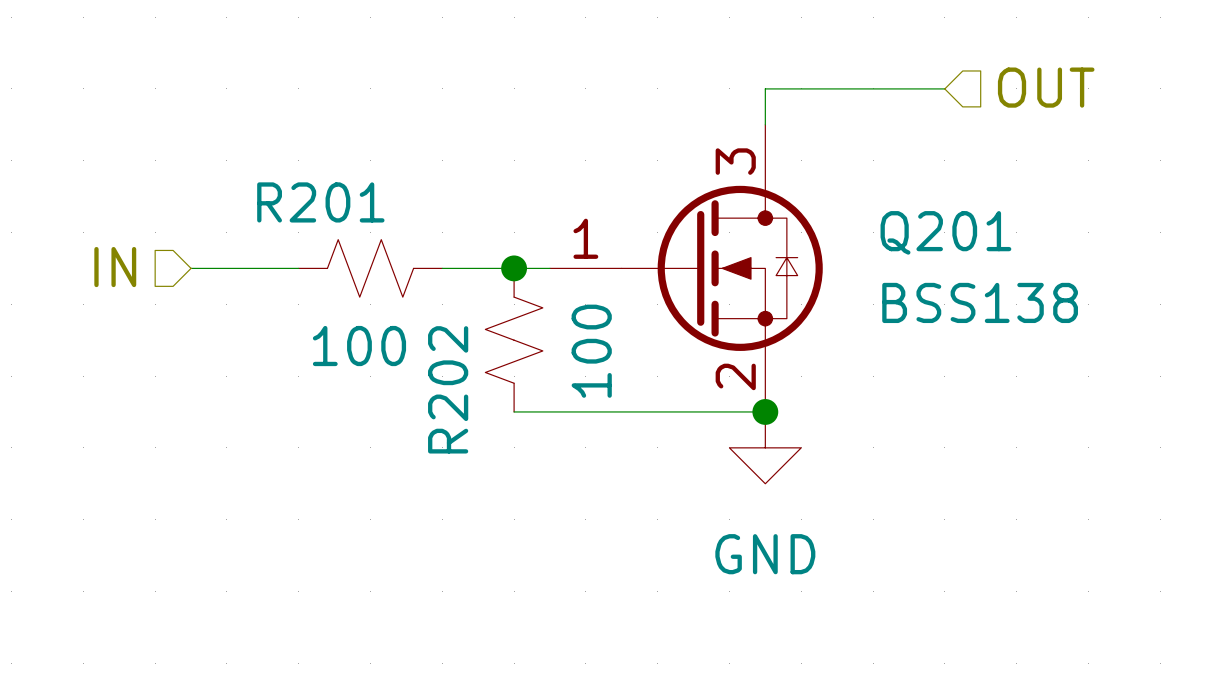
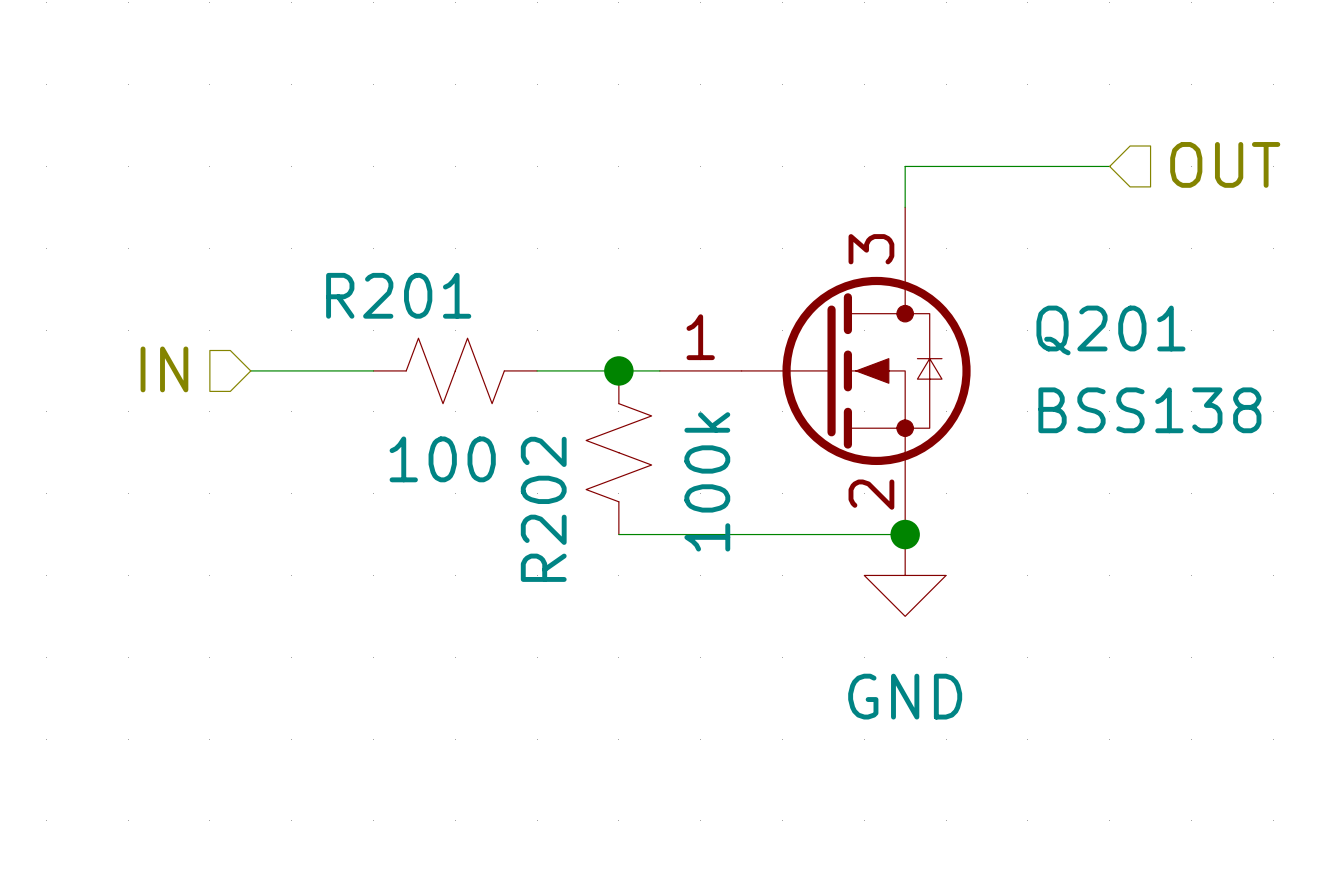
R202 value: 100 (591, 351) -> 100k (707, 481)

